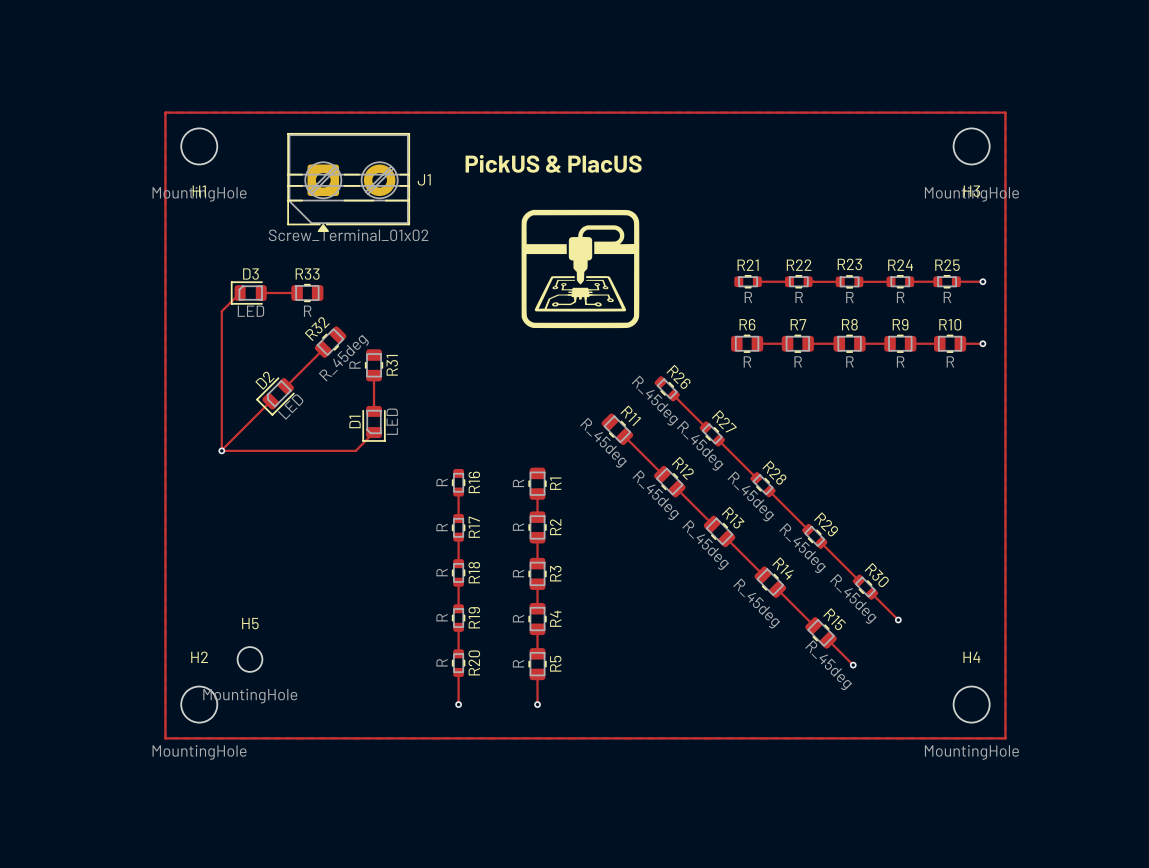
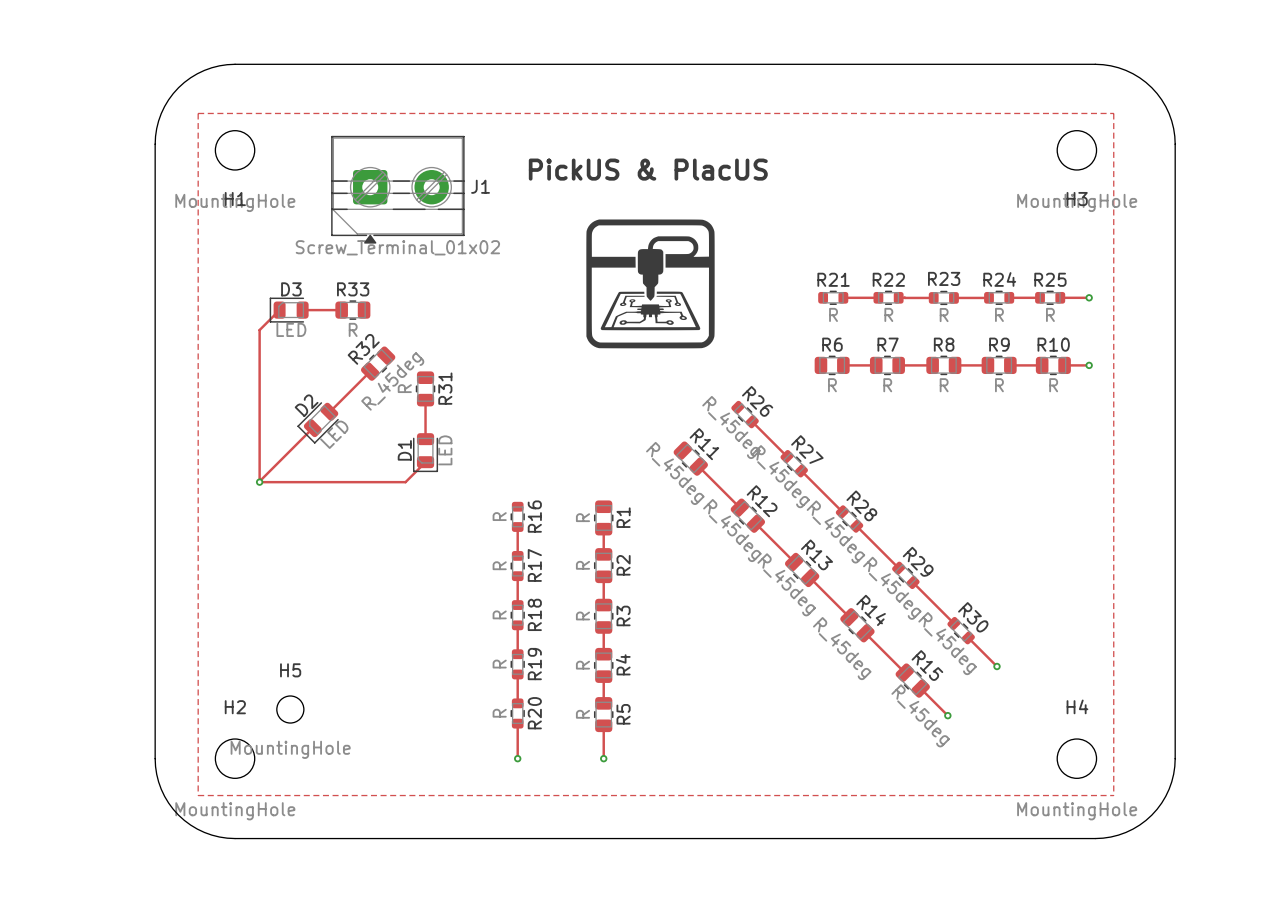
board edge: none -> (235, 64) (1095, 64) (1110, 65) (1125, 70) (1145, 82) (1157, 93) (1165, 106) (1171, 121) (1175, 144) (1175, 758) (1173, 774) (1169, 789) (1157, 809) (1145, 820) (1132, 829) (1110, 837) (1095, 838) (235, 838) (219, 837) (204, 832) (184, 820) (173, 809) (164, 796) (158, 781) (155, 758) (155, 136) (158, 121) (164, 106) (173, 93) (184, 82) (197, 73) (211, 67) (235, 64)
track: (165, 112) (1005, 112) (1005, 738) (165, 738) (165, 112) -> none

